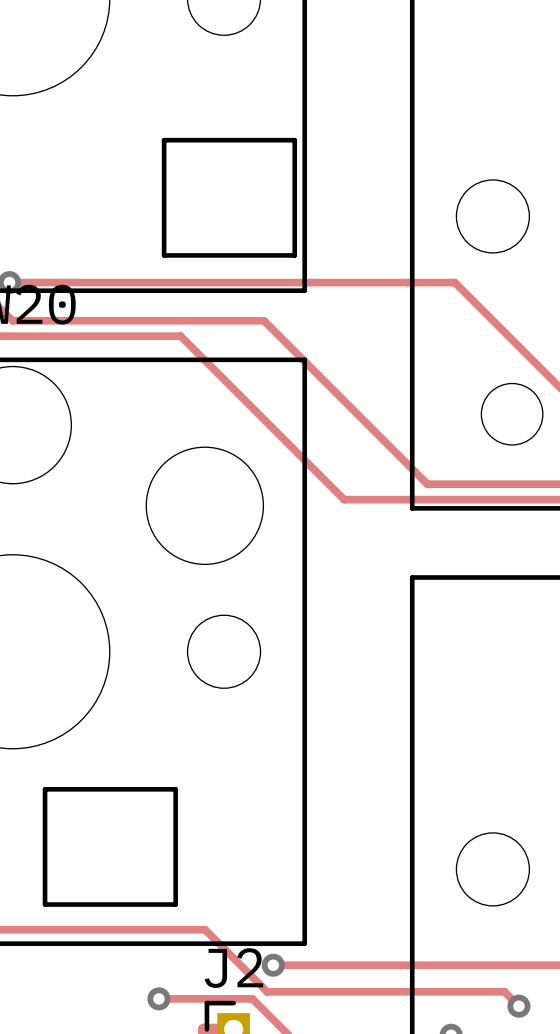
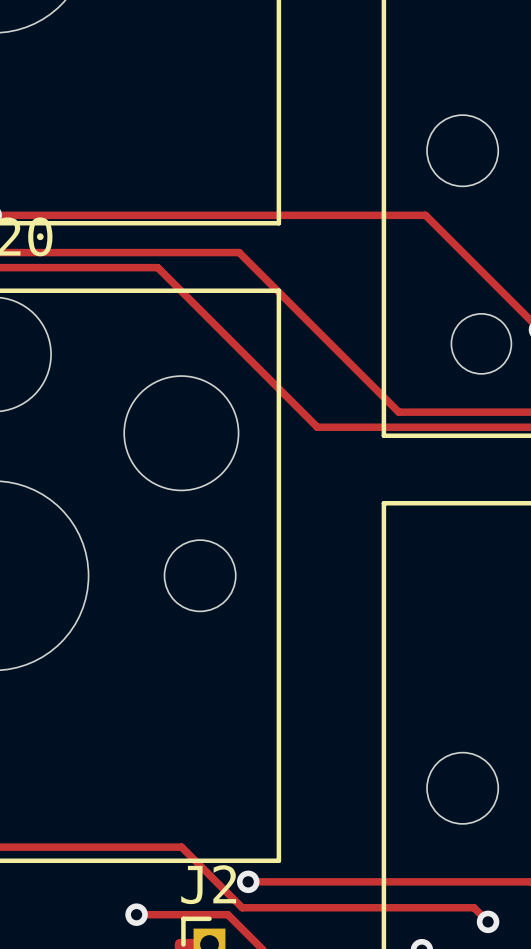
part: (229, 197) -> none
part: (110, 846) -> none

